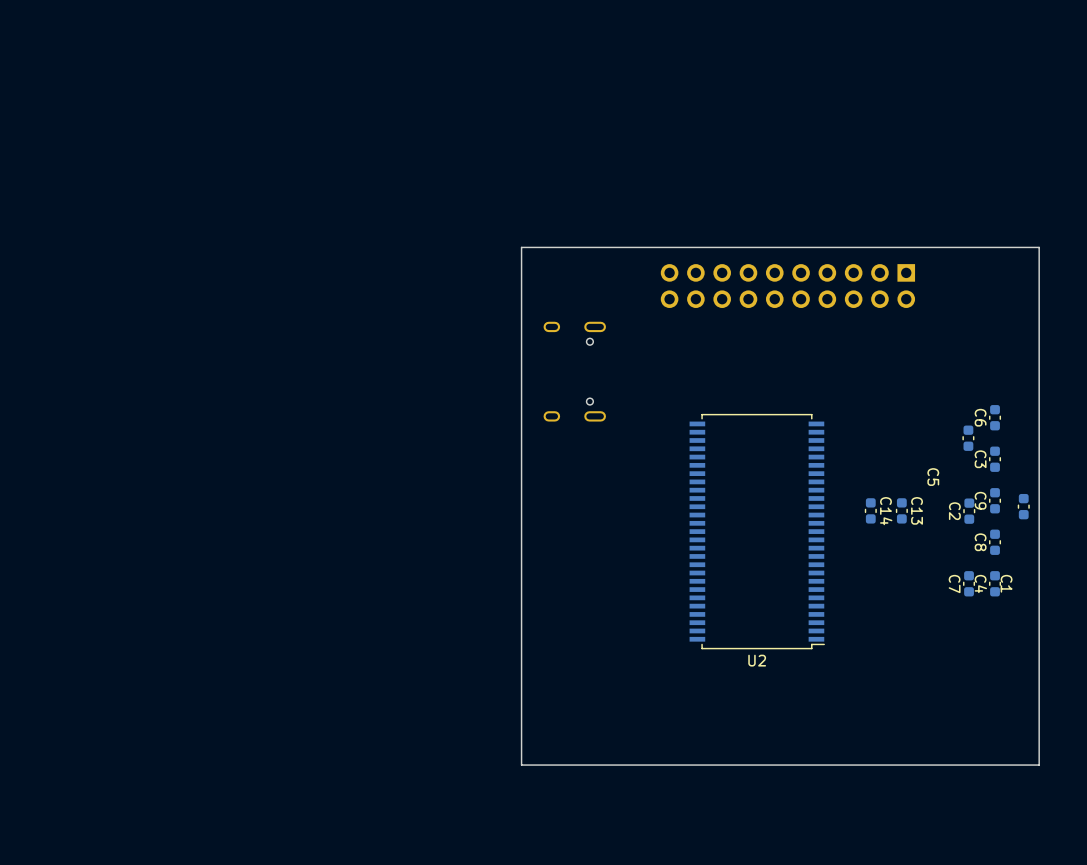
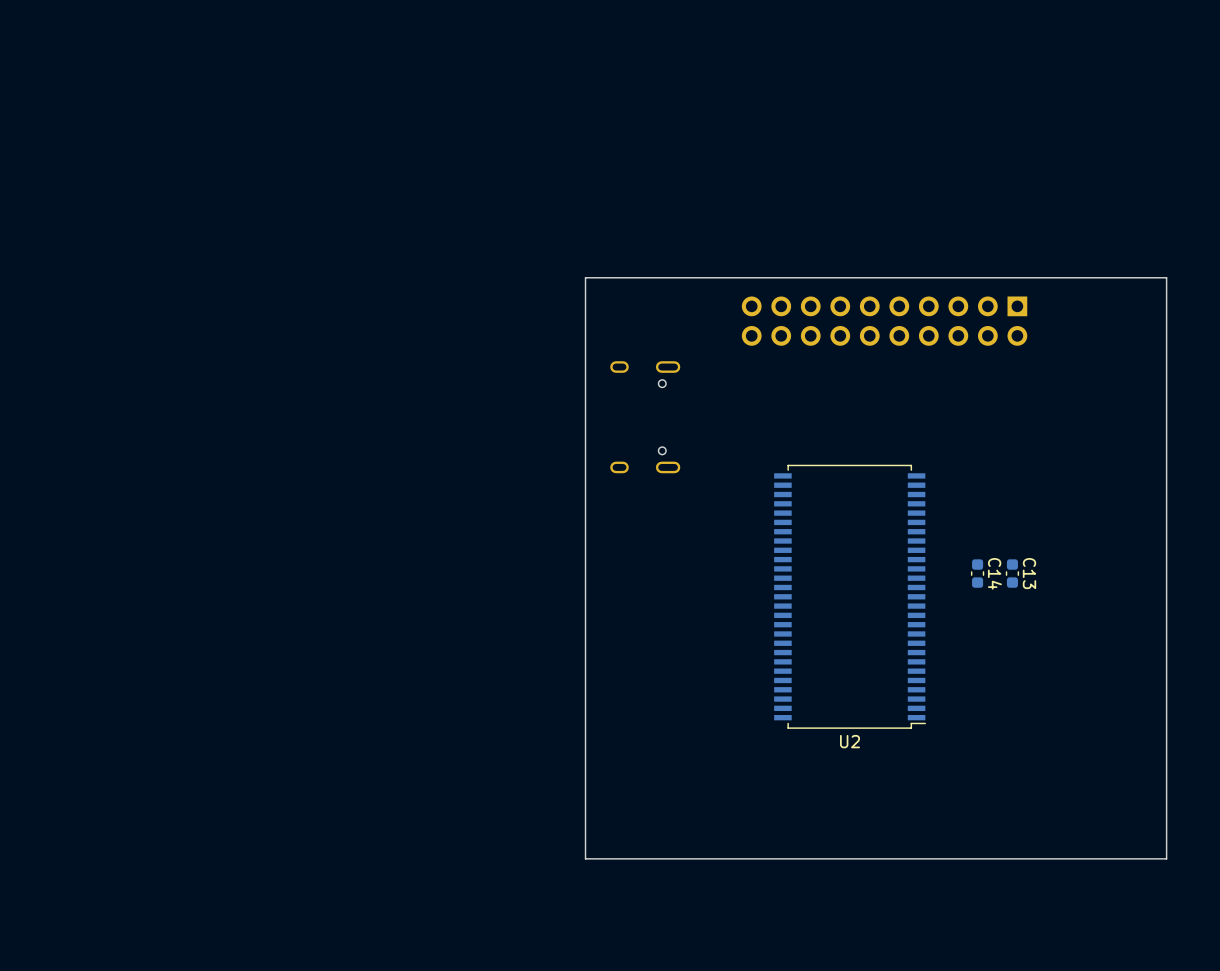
C6: (995, 417) -> none
C5: (968, 438) -> none
C3: (995, 459) -> none
C9: (995, 500) -> none
C1: (1023, 506) -> none
C2: (969, 511) -> none
C8: (995, 542) -> none
C7: (969, 583) -> none
C4: (995, 583) -> none

